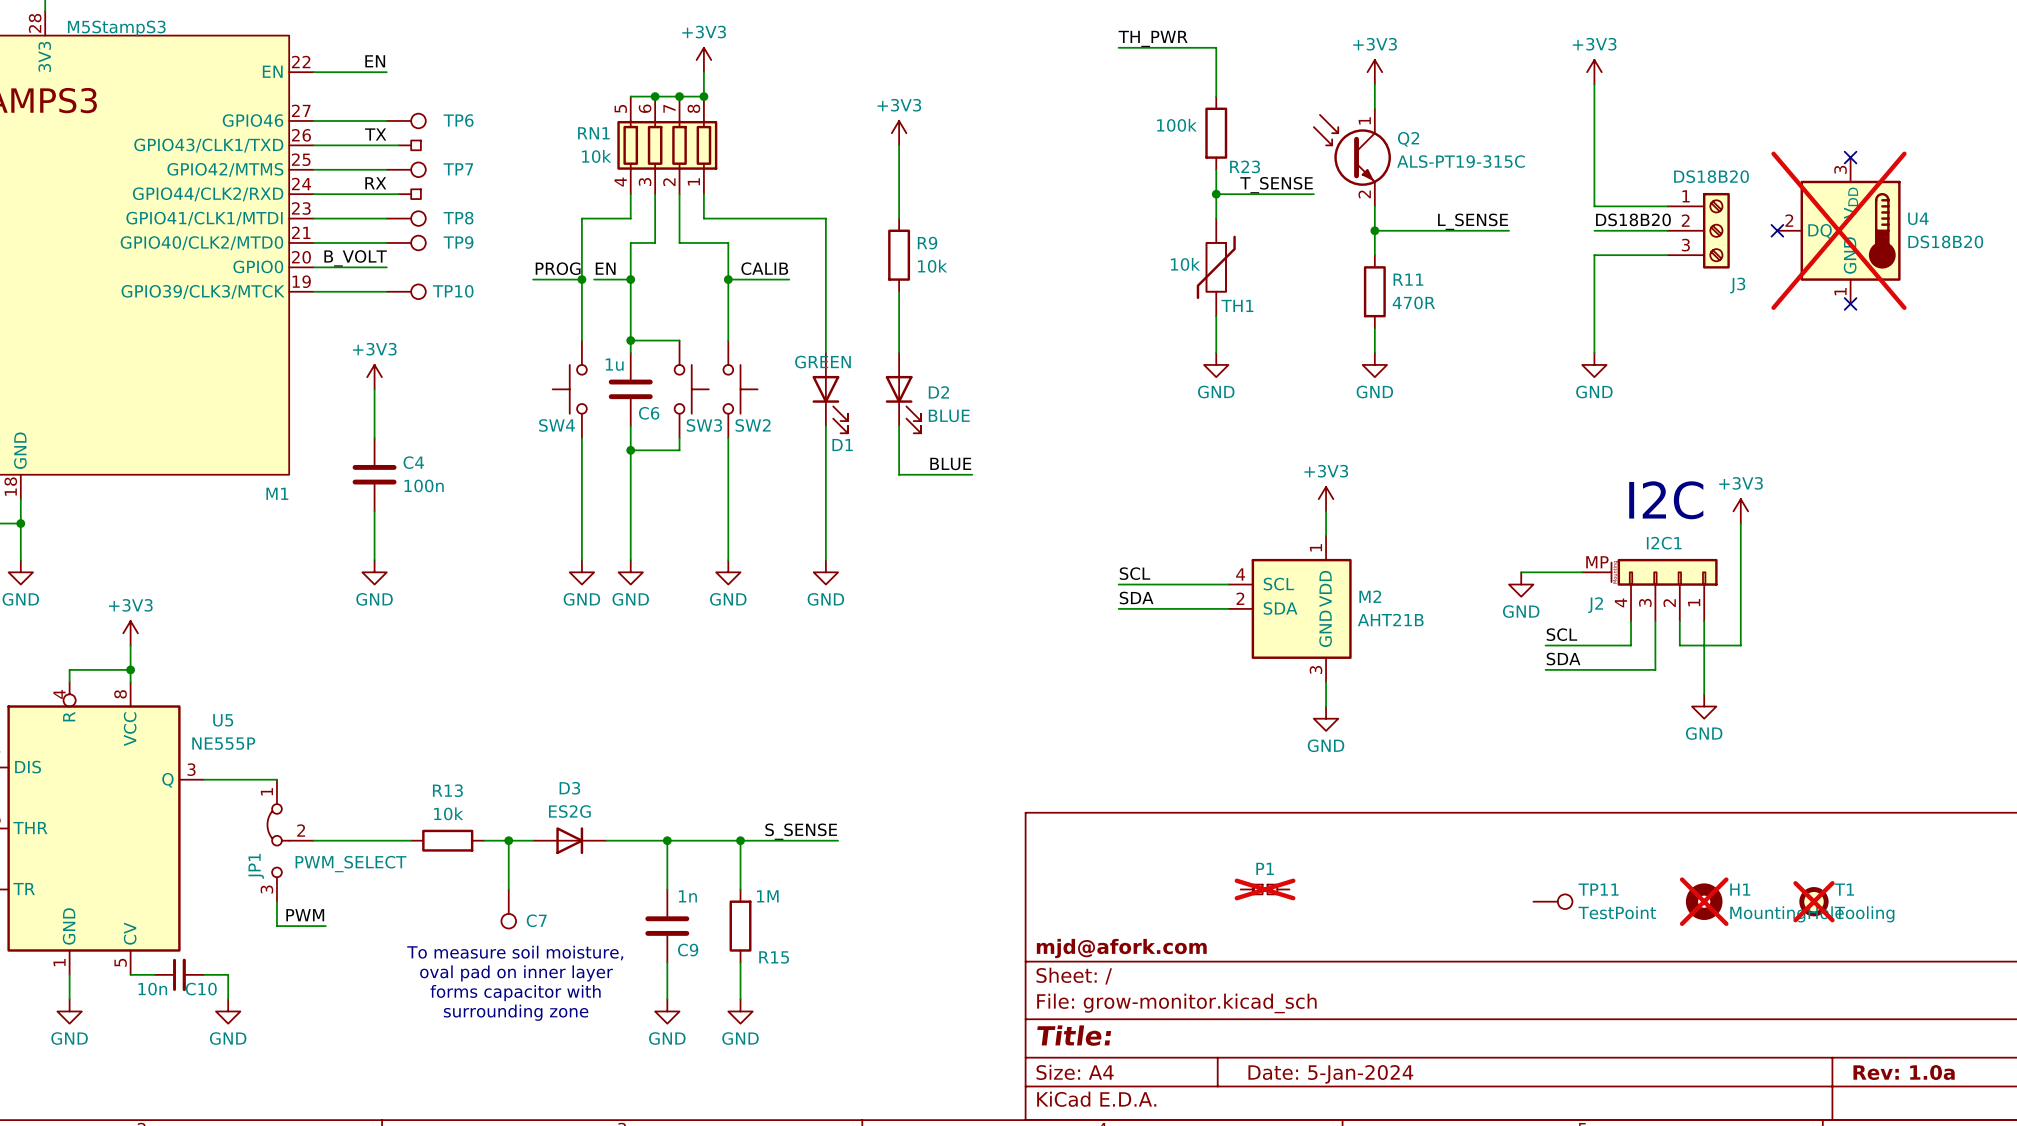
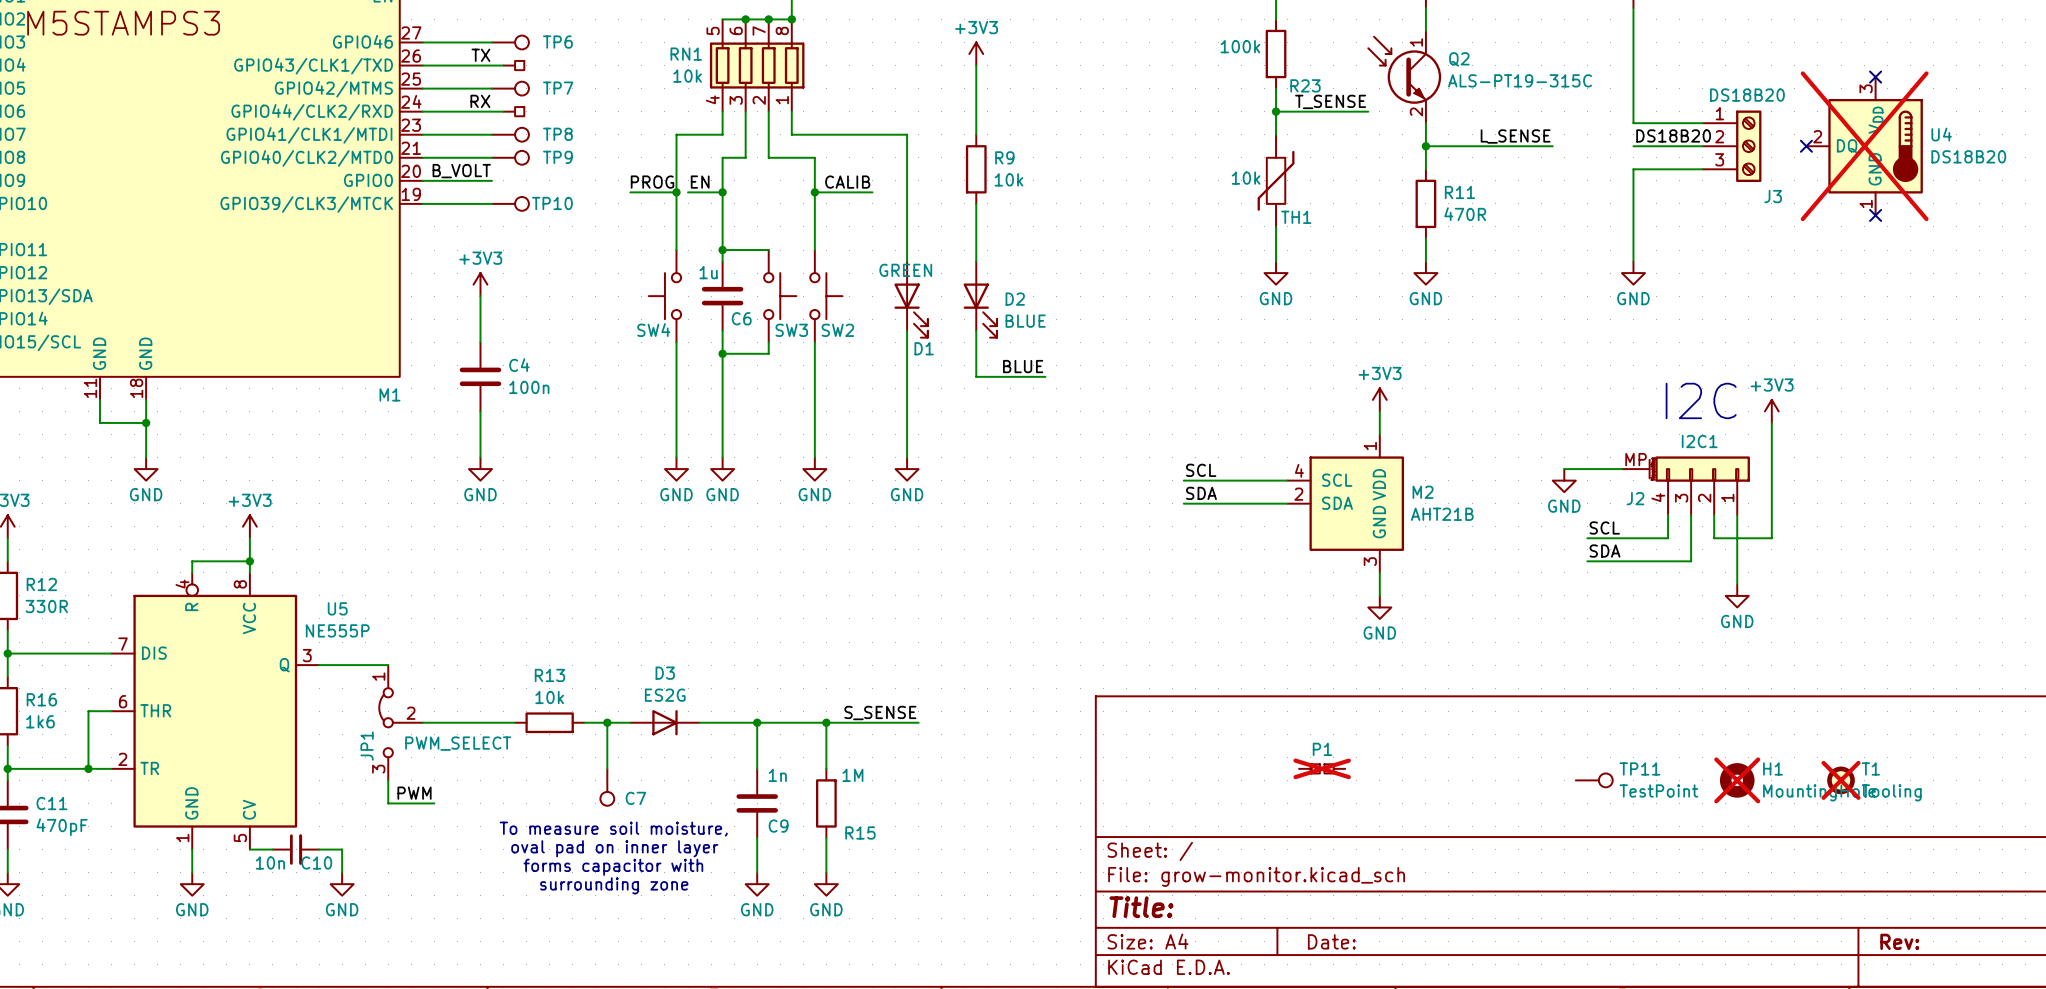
title block: mjd@afork.com (1121, 948) -> none
title block: Rev: 1.0a (1904, 1072) -> Rev: (1899, 941)
title block: Date: 5-Jan-2024 (1330, 1074) -> Date: (1331, 941)

